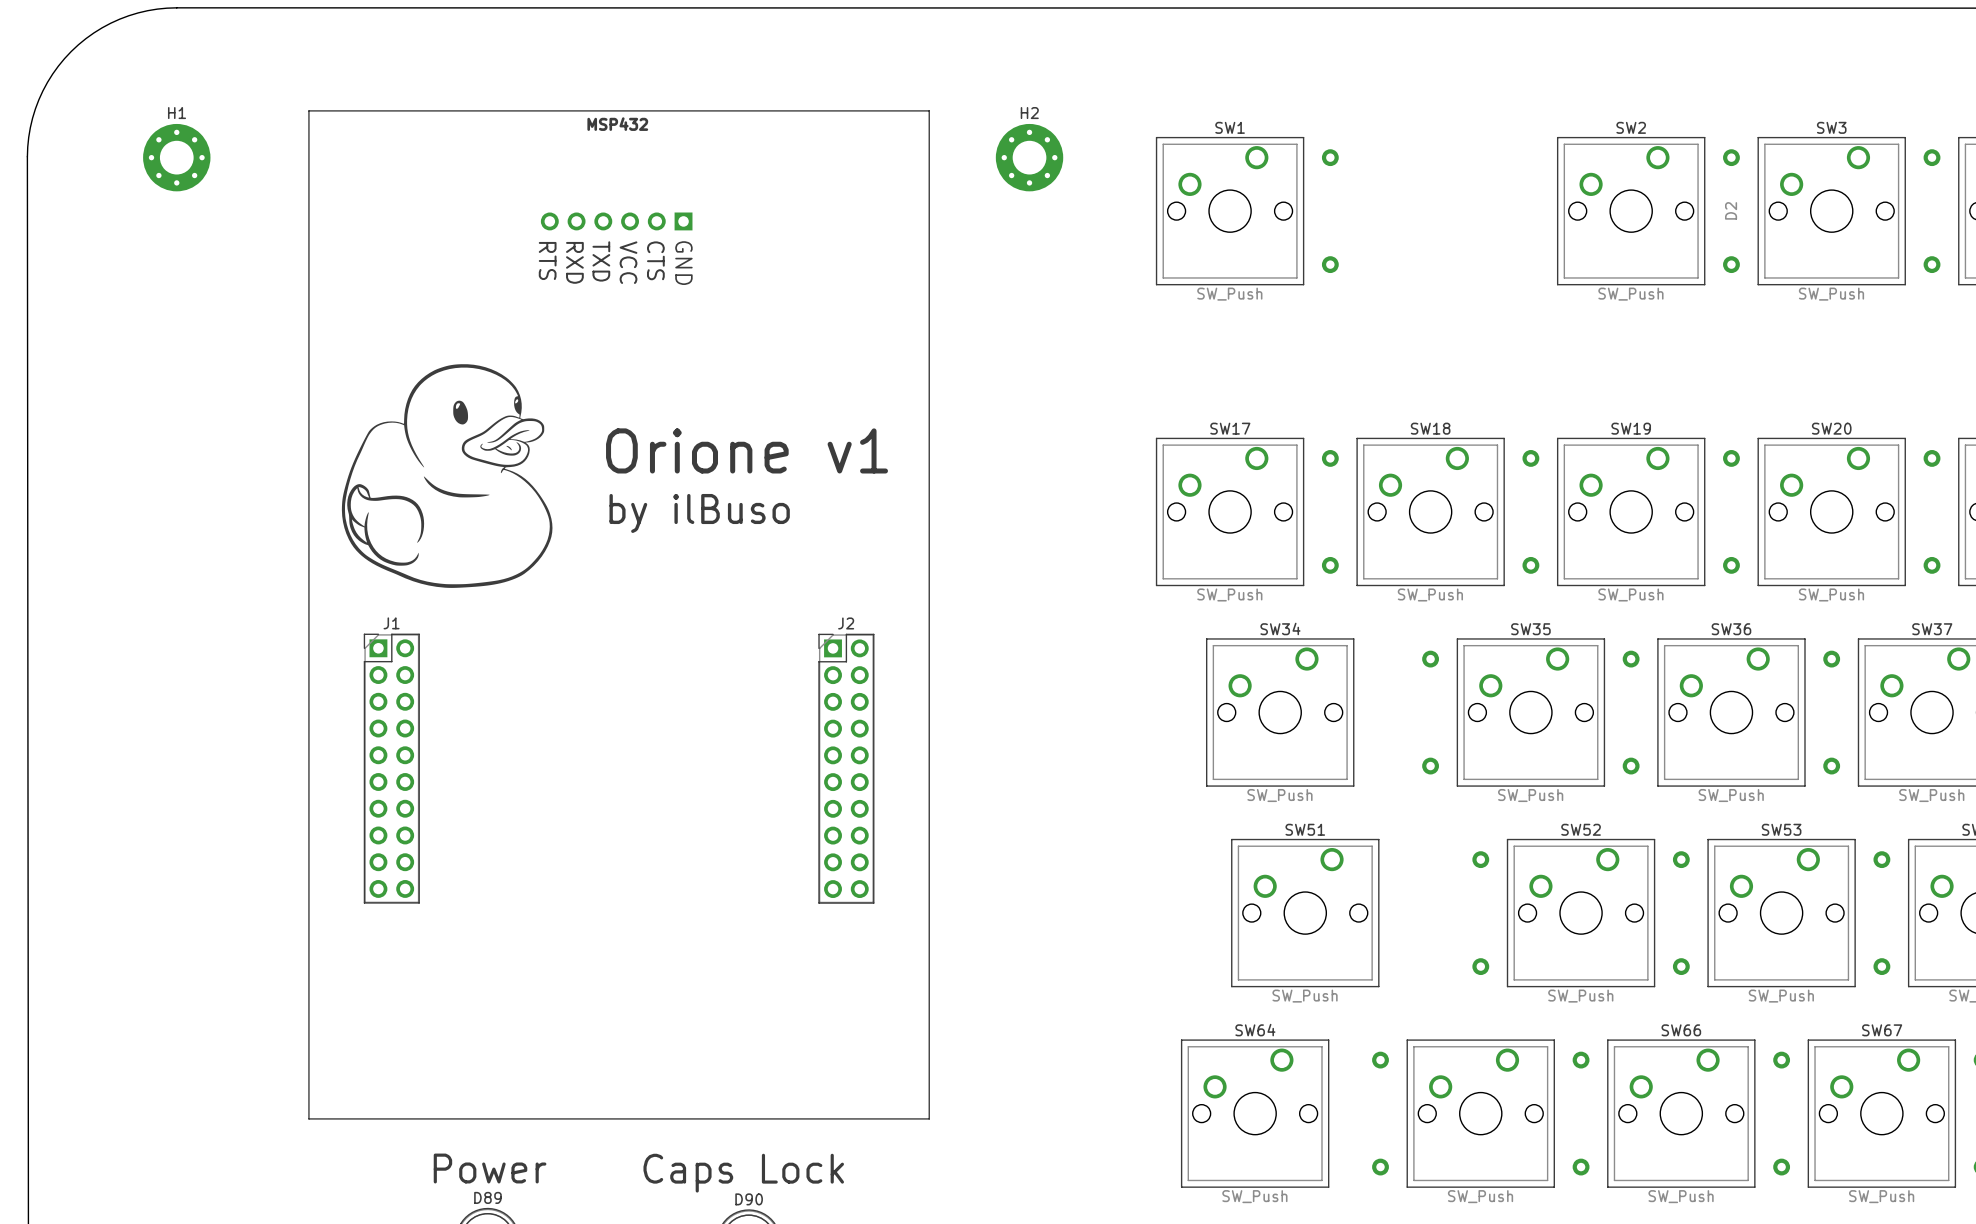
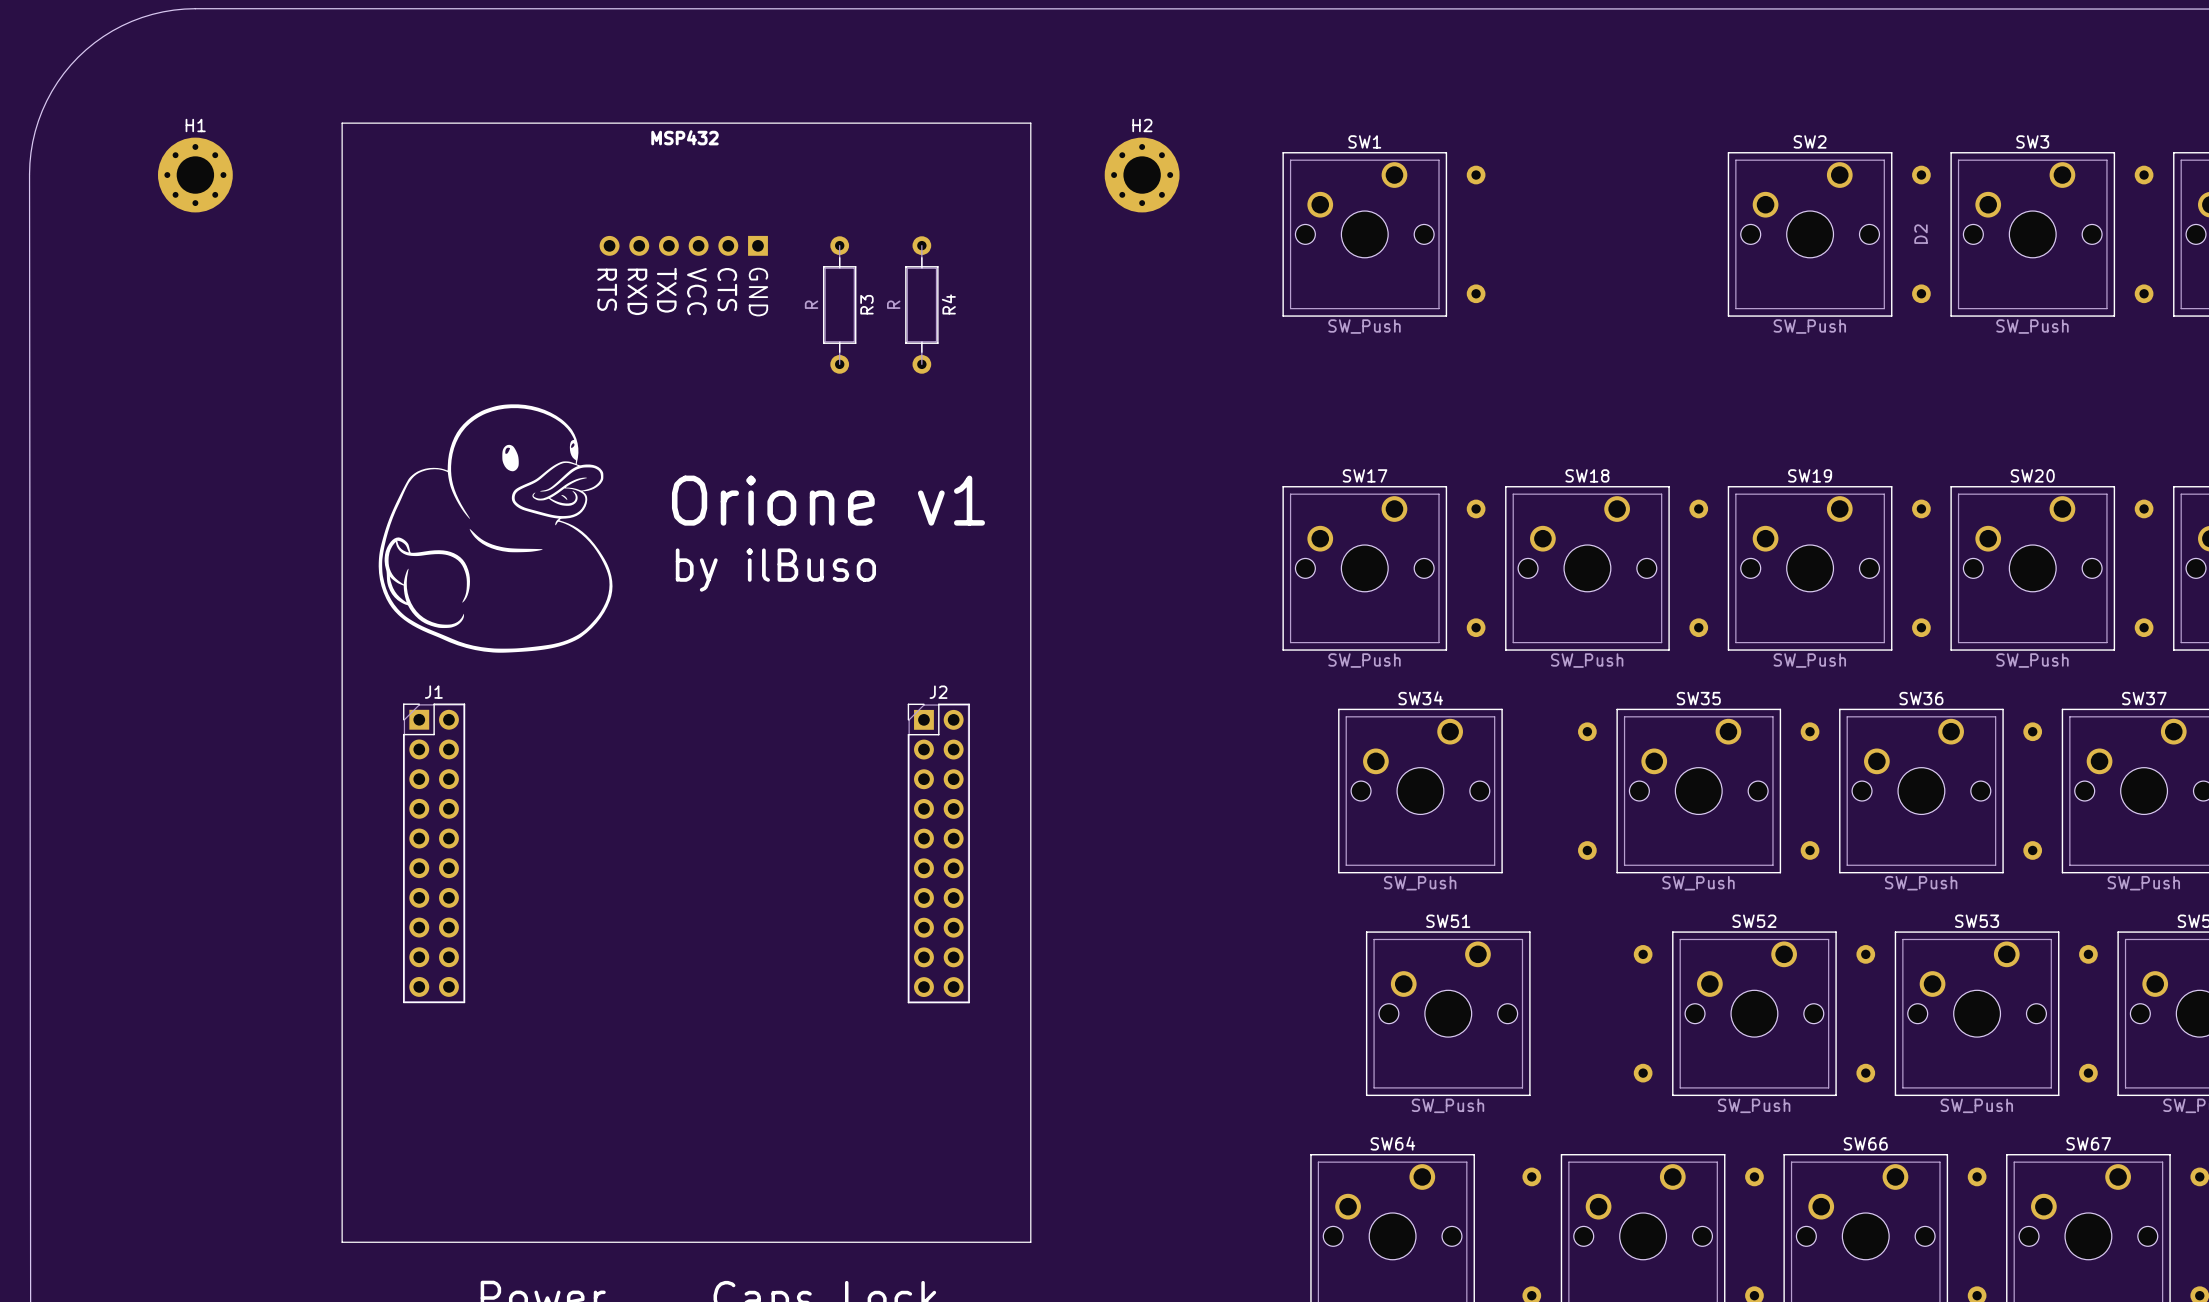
R3: none -> R (839, 305)
R4: none -> R (921, 305)

